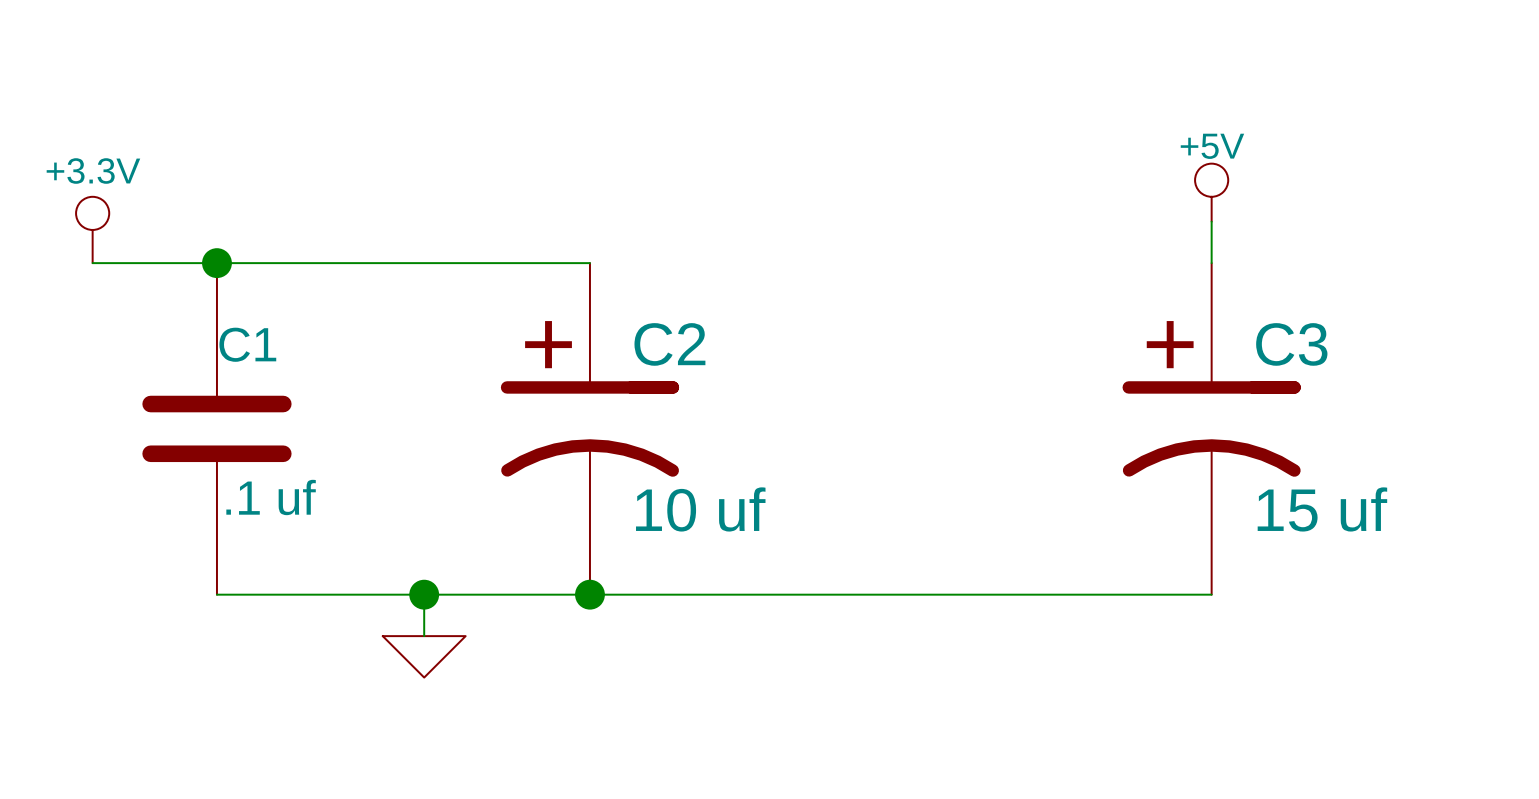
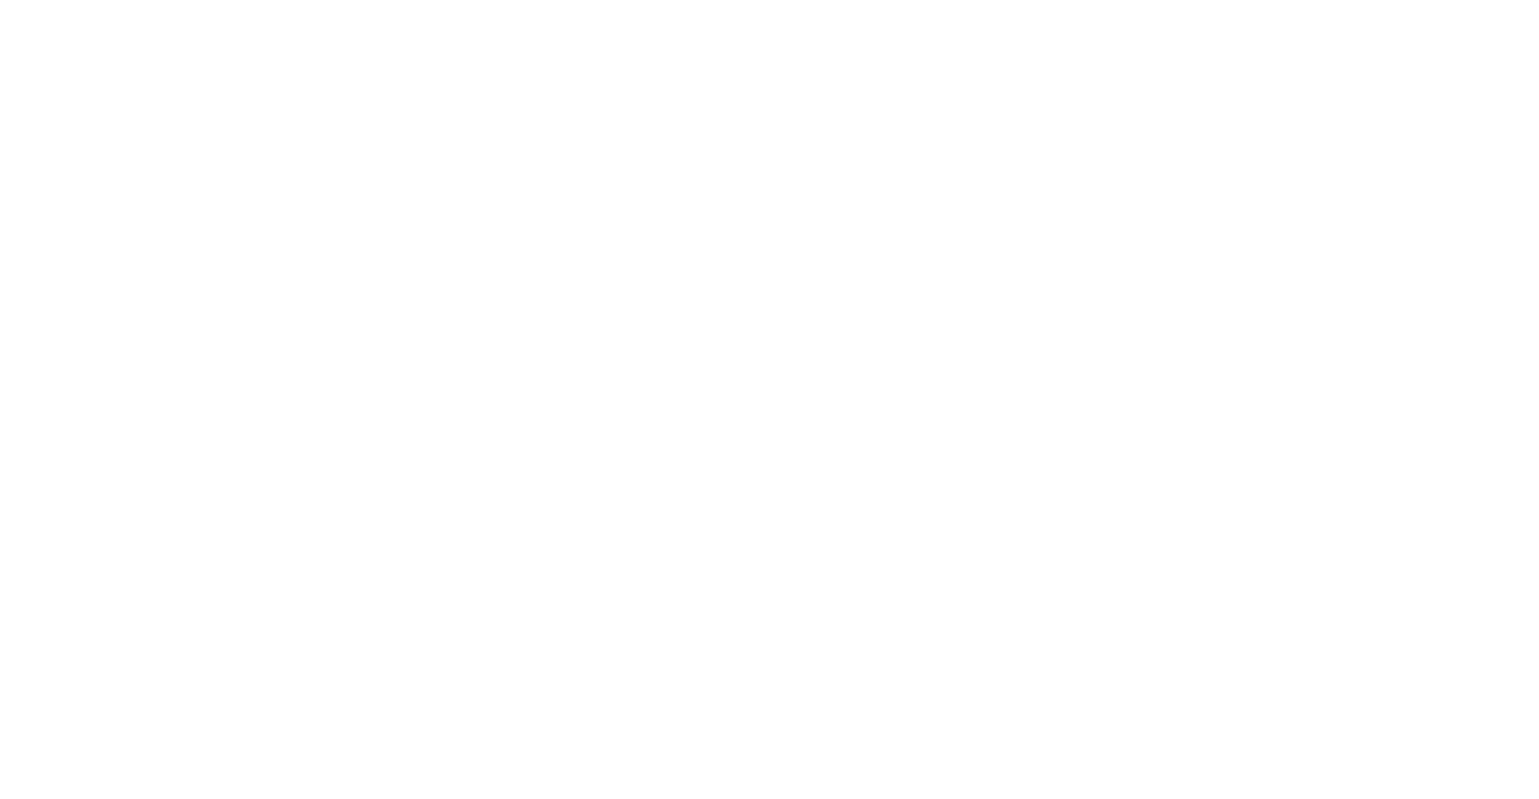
power symbol: +5V (1211, 192) -> none
wire: (1211, 221) (1211, 263) -> none
power symbol: +3.3V (92, 229) -> none
wire: (92, 263) (589, 263) -> none
junction: (216, 263) -> none
C1: .1 uf (216, 428) -> none
C2: 10 uf (589, 428) -> none
C3: 15 uf (1211, 428) -> none
wire: (216, 594) (1211, 594) -> none
wire: (424, 594) (424, 636) -> none
junction: (424, 594) -> none
junction: (589, 594) -> none
power symbol: (424, 656) -> none

